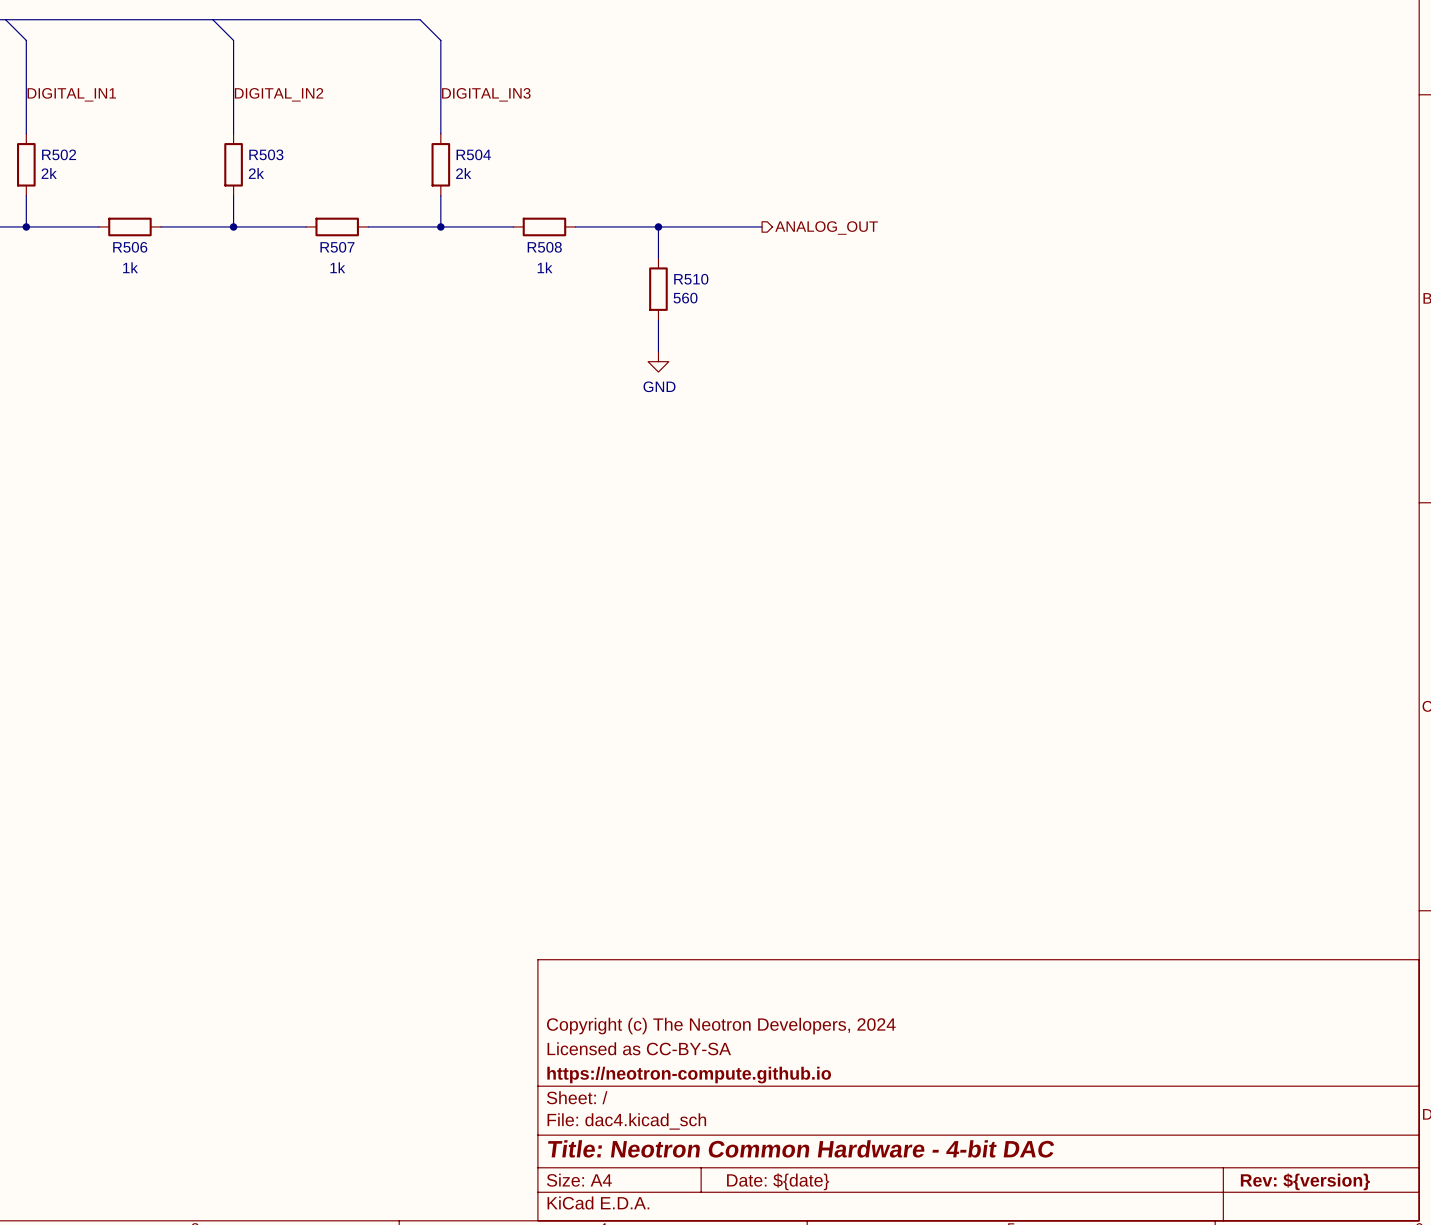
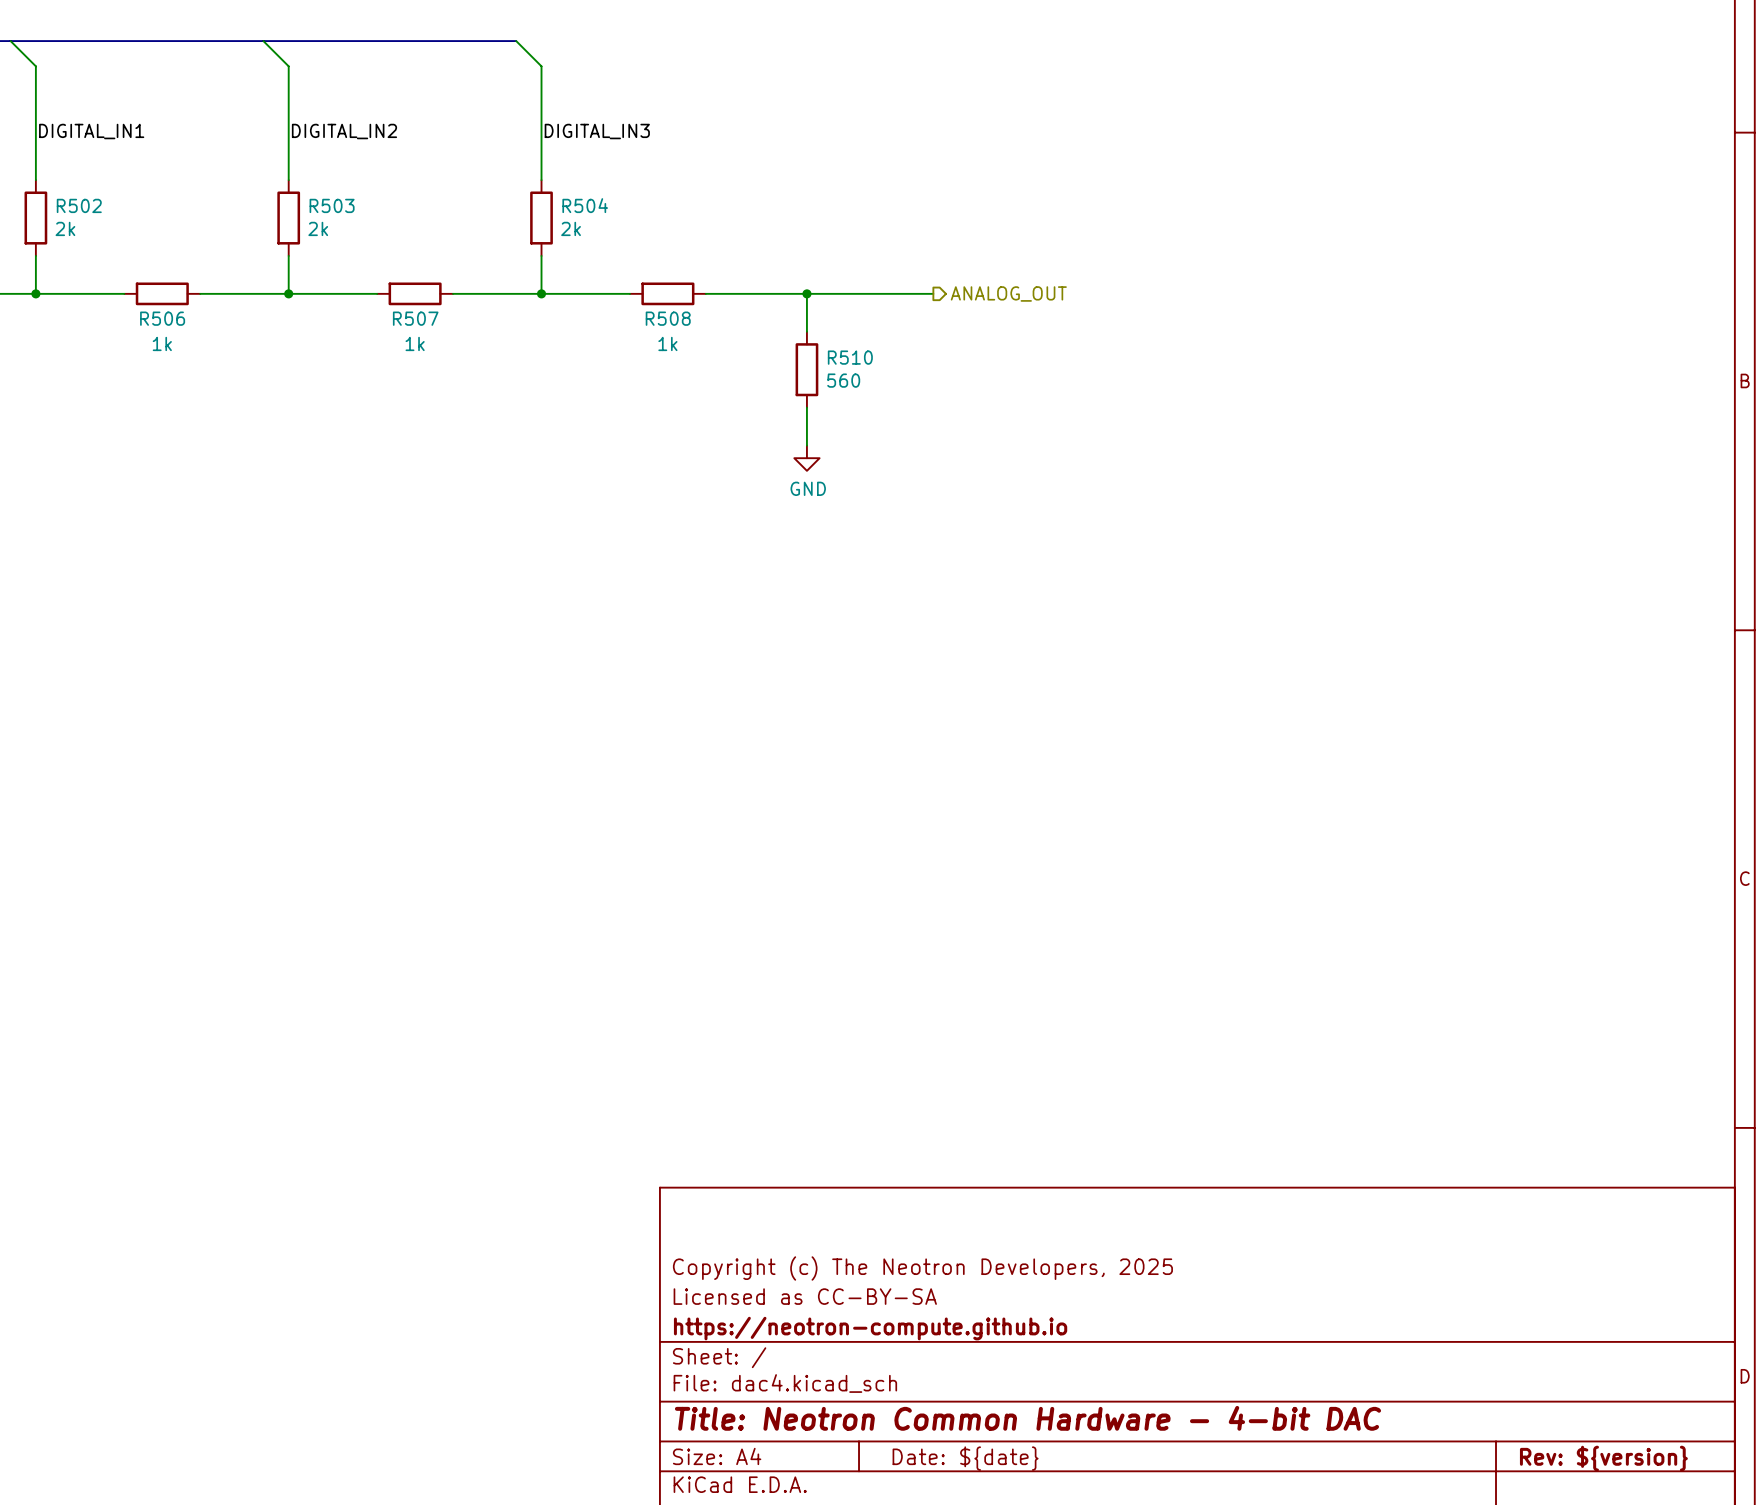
title block: Copyright (c) The Neotron Developers, 2024 (721, 1026) -> Copyright (c) The Neotron Developers, 2025 (922, 1268)

